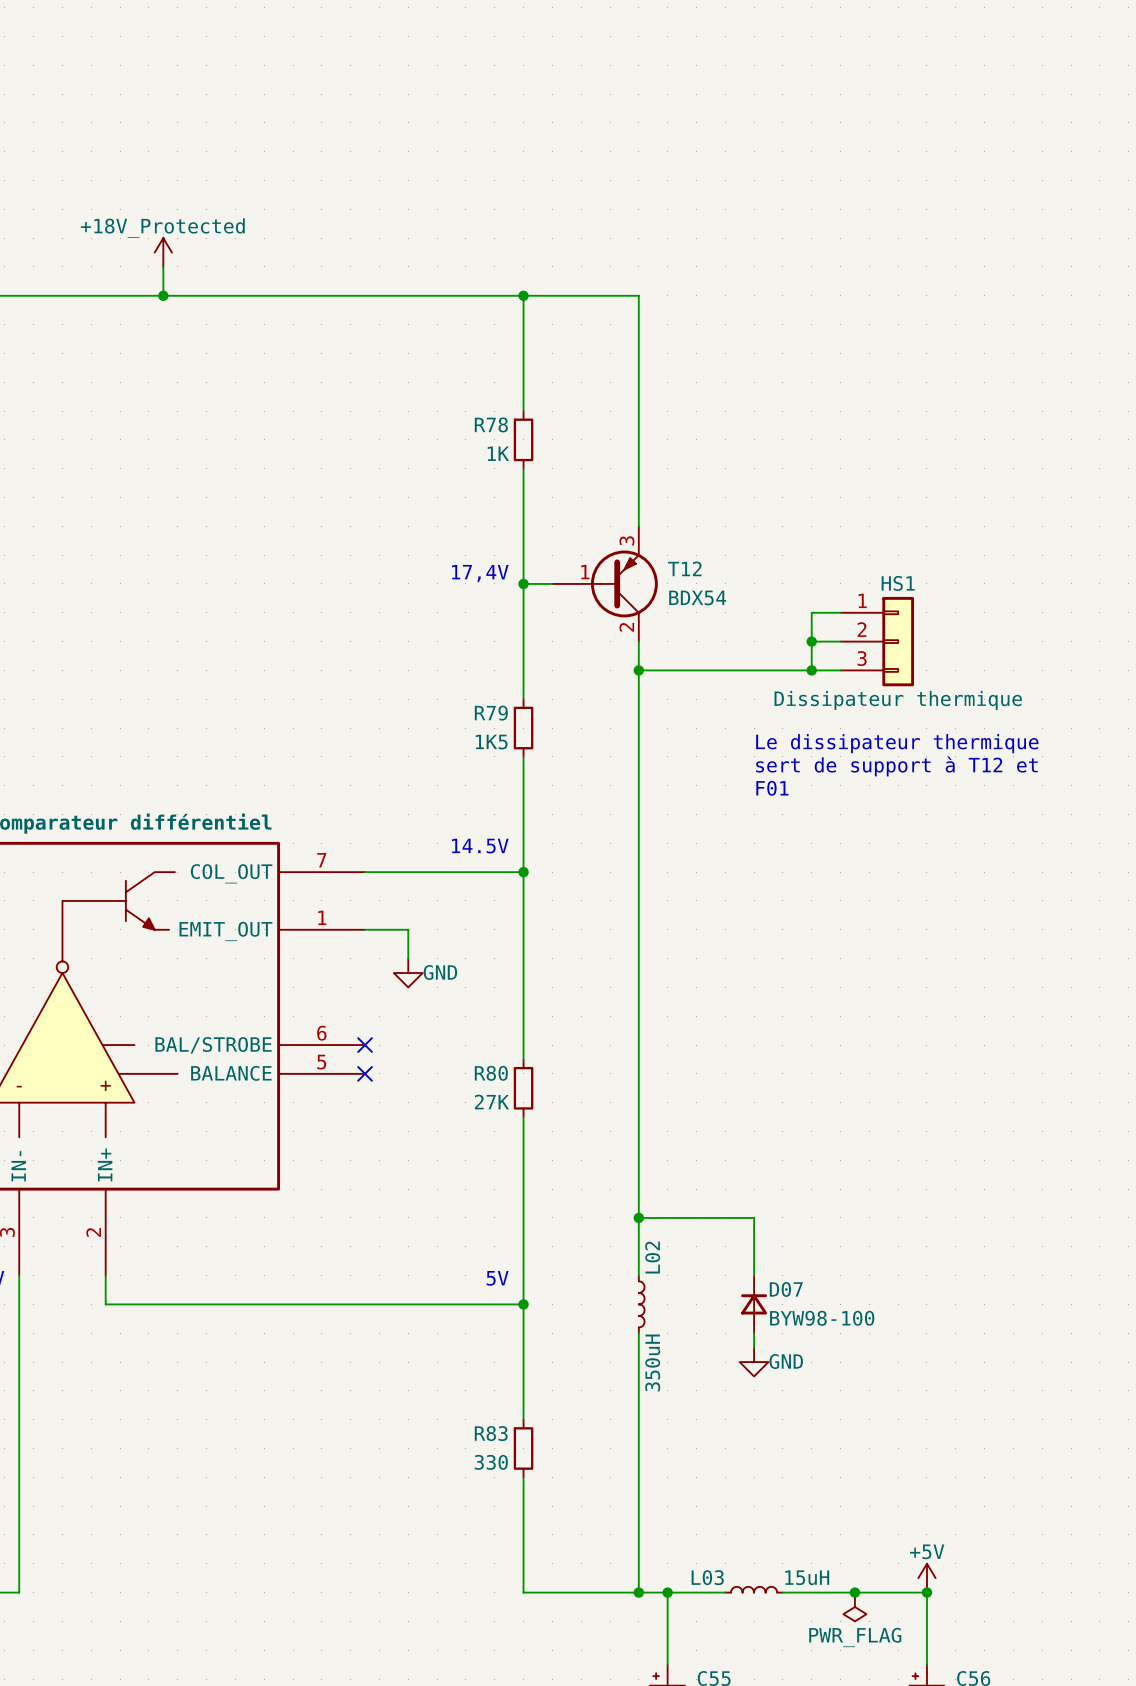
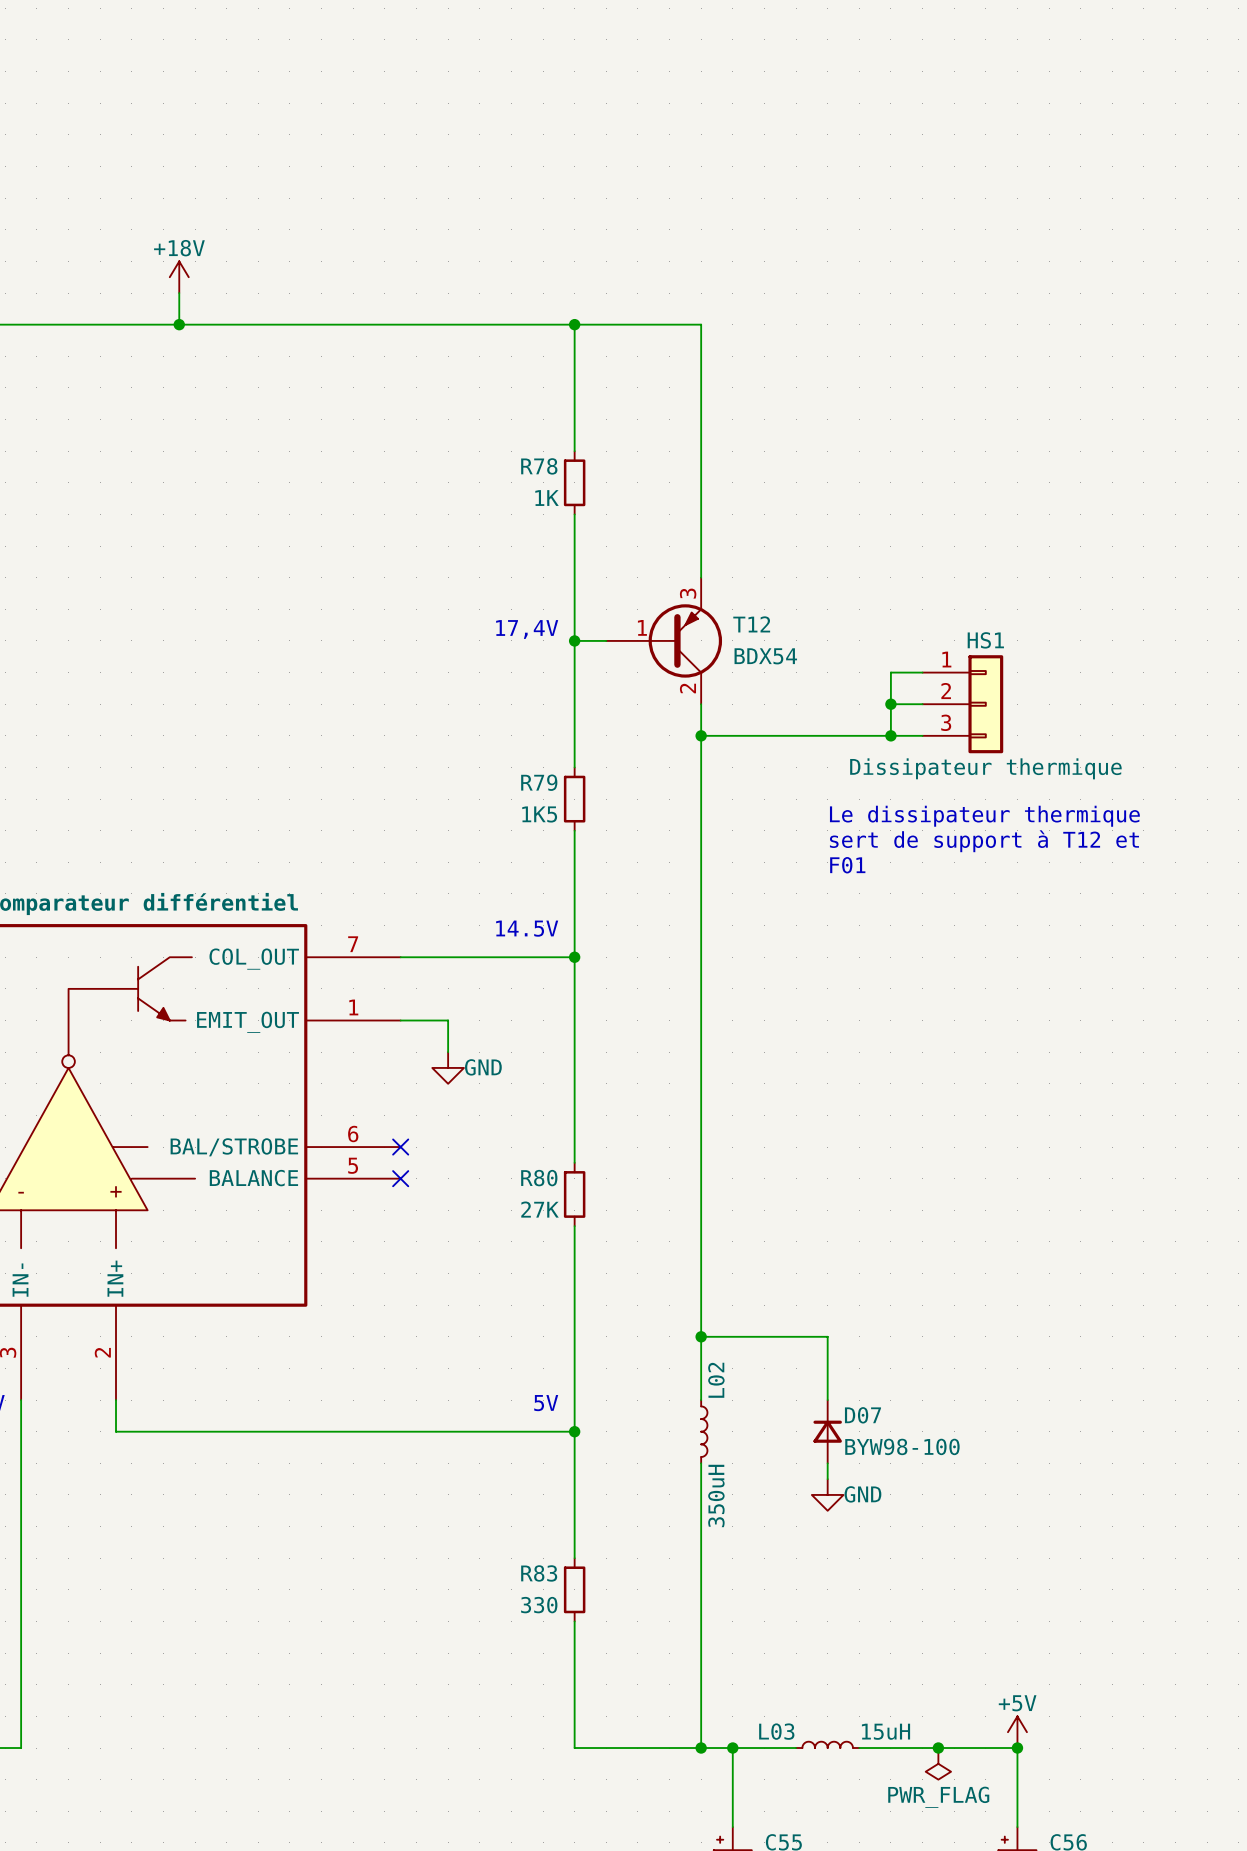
power symbol: +18V_Protected (163, 252) -> +18V (179, 277)

